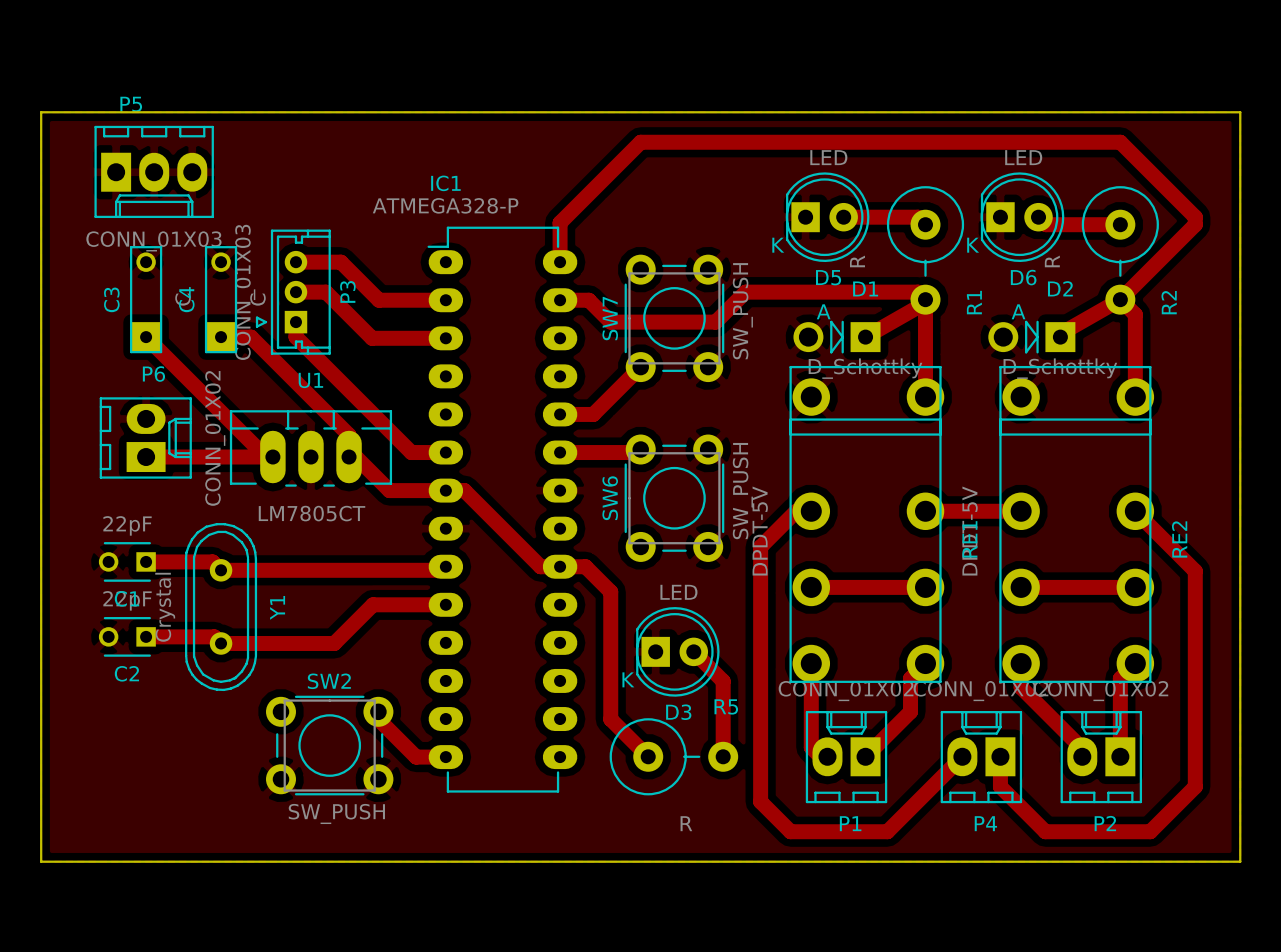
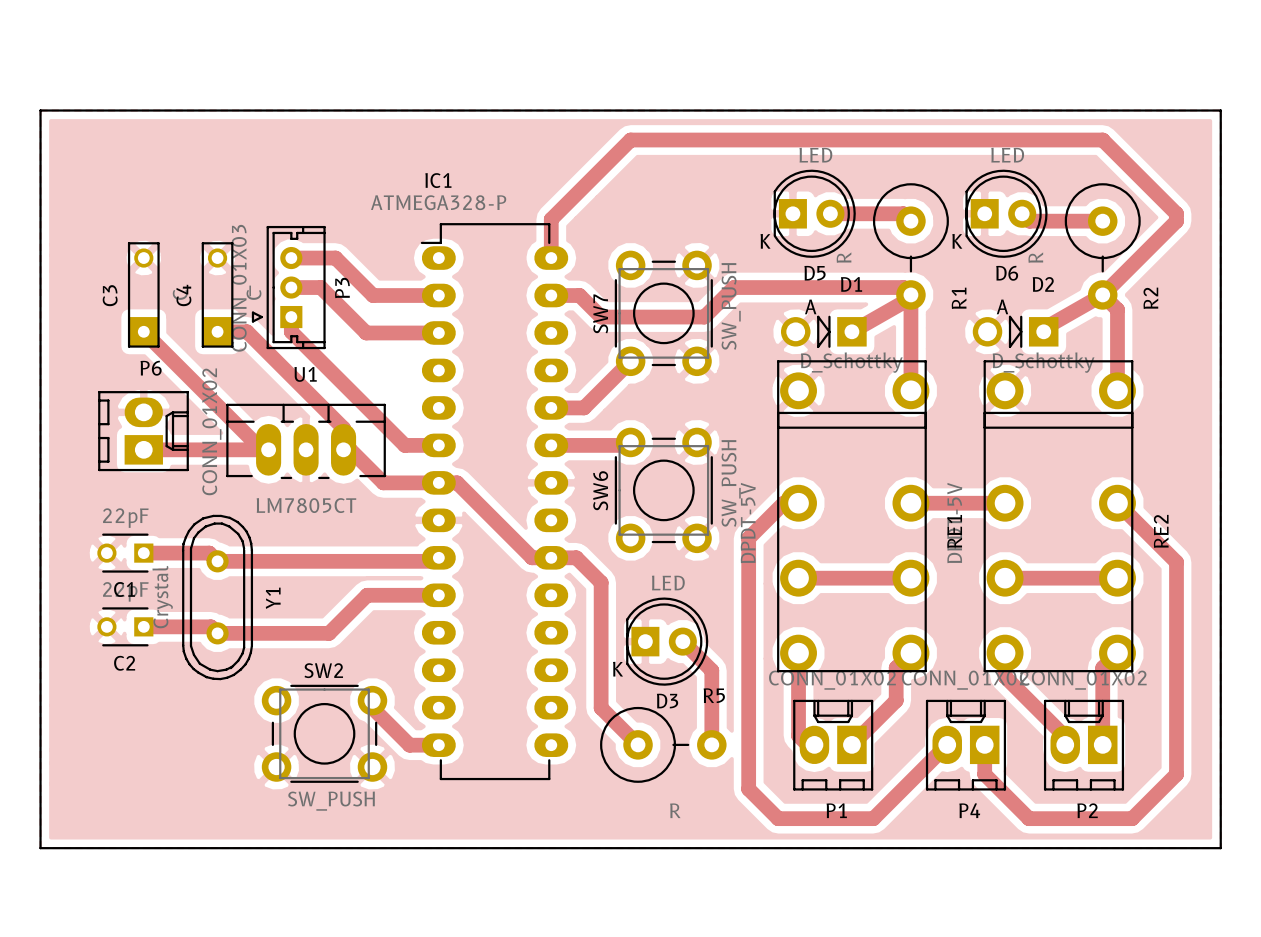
P5: CONN_01X03 (154, 171) -> none

